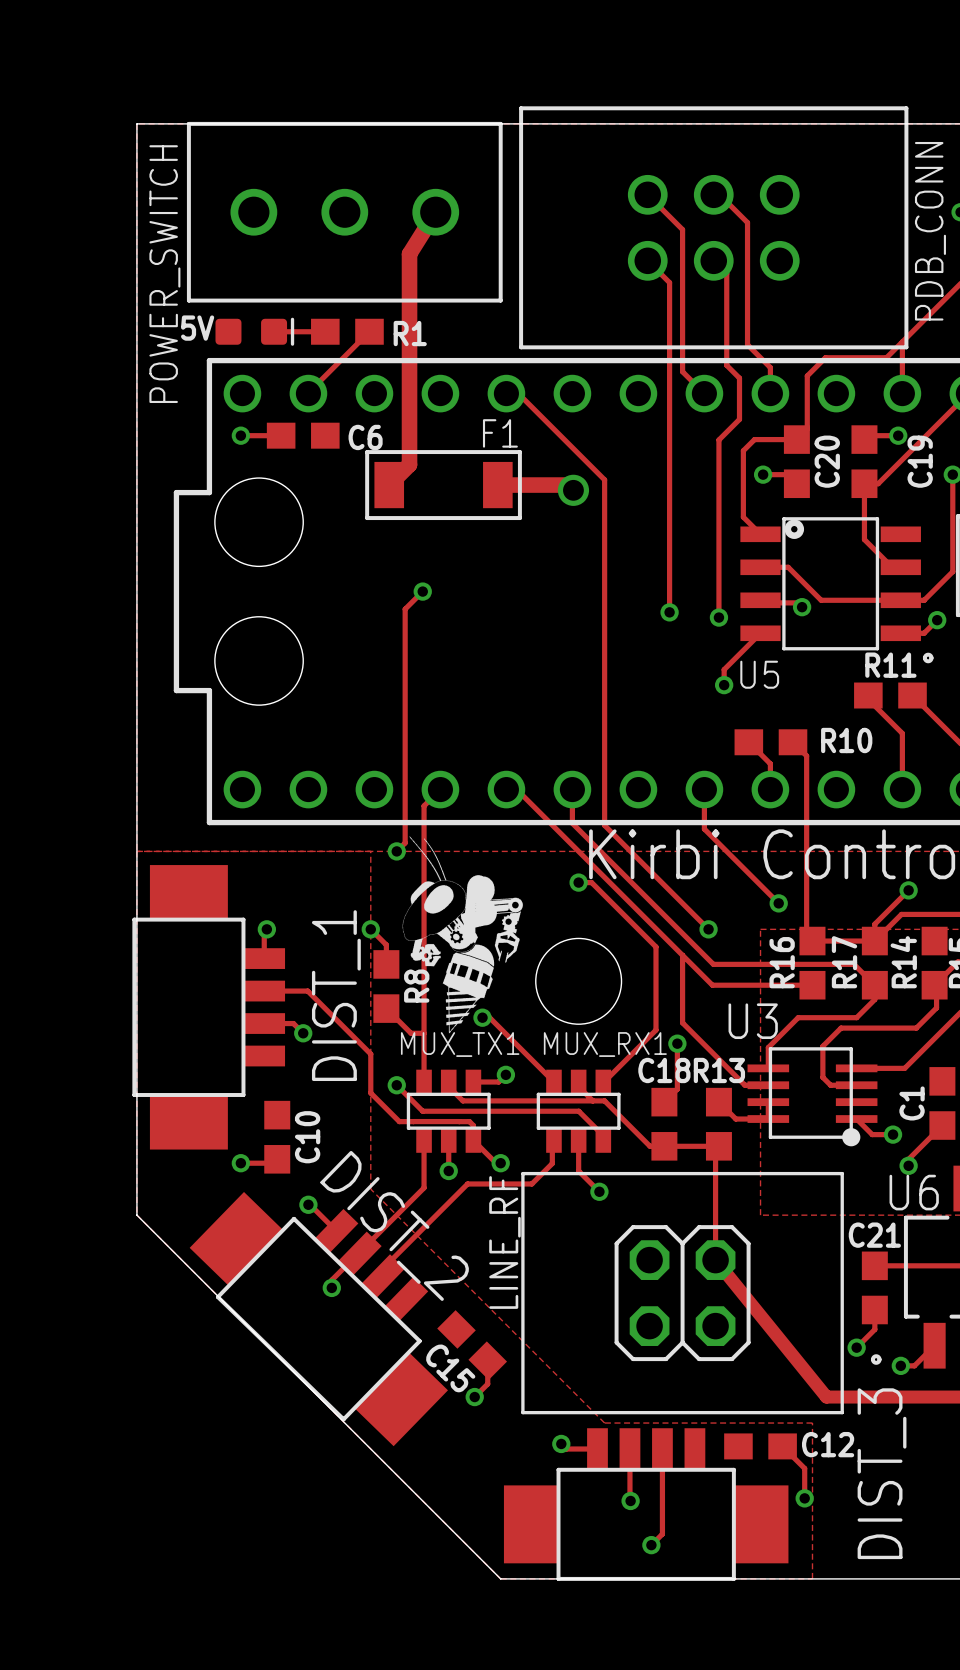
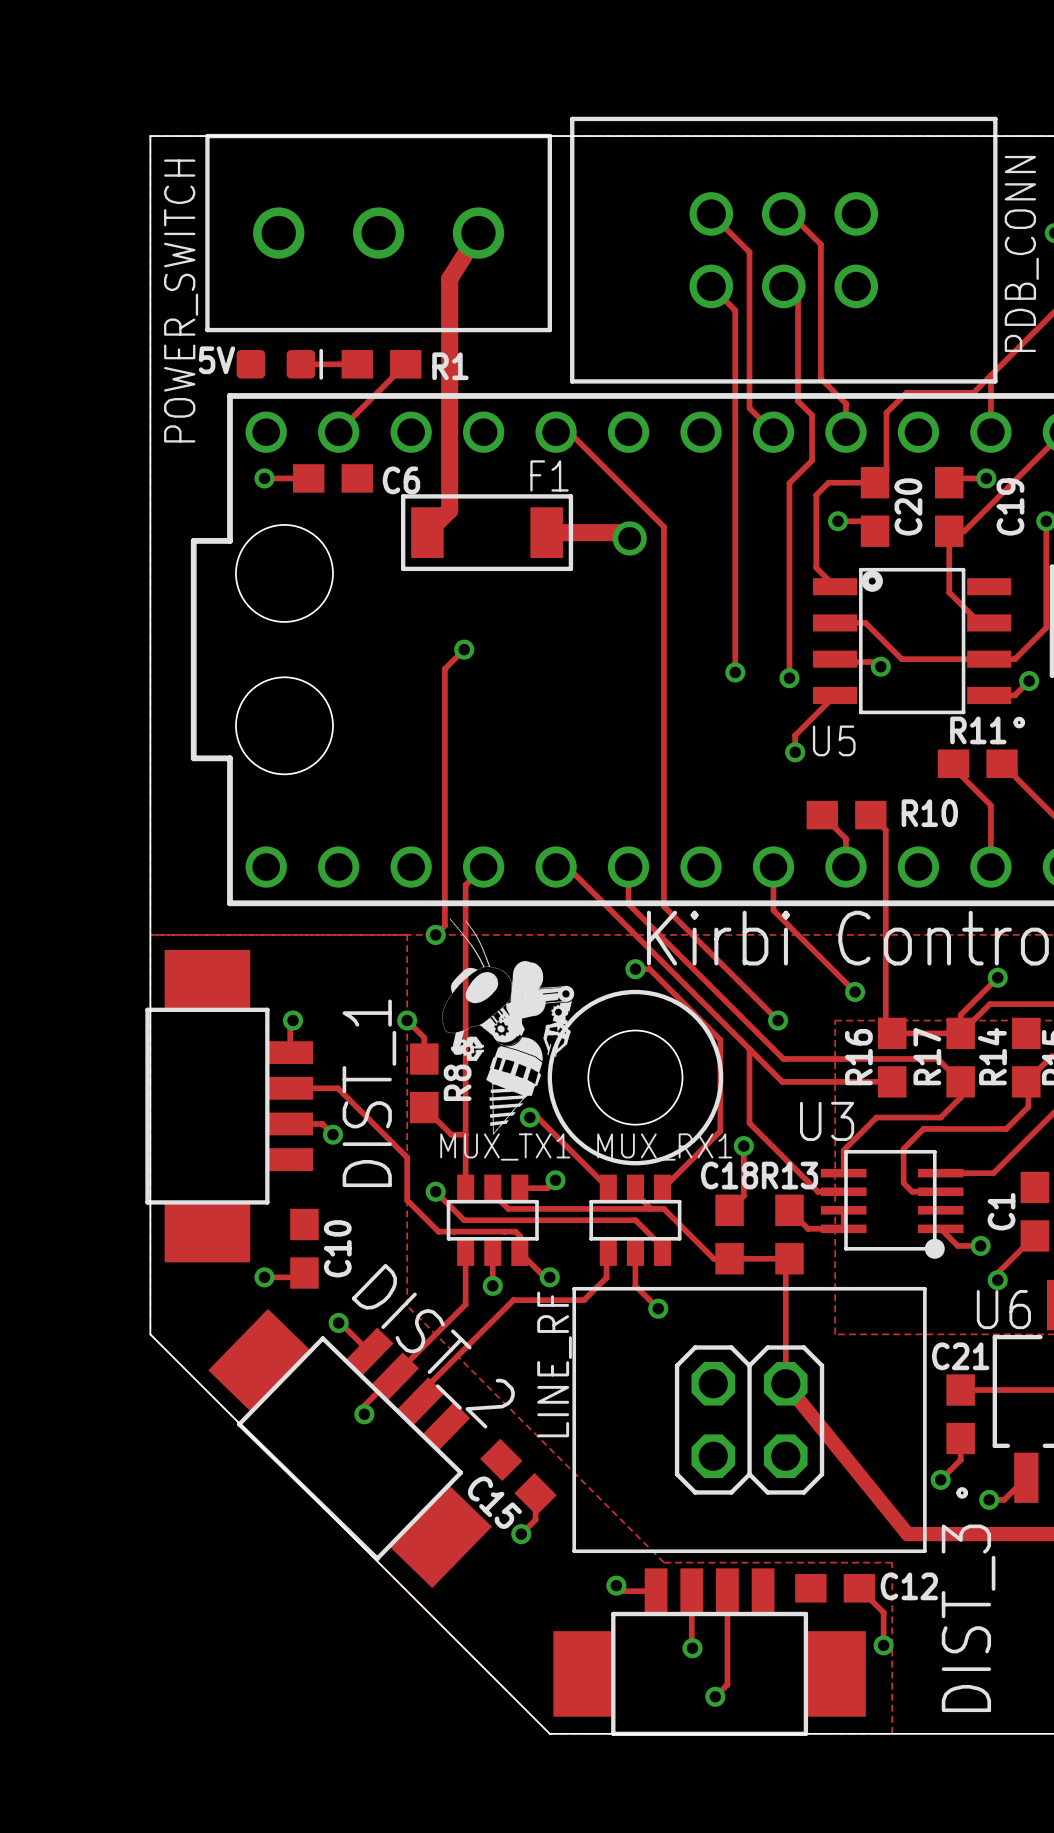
drawing: none -> [547, 989, 724, 1166]

